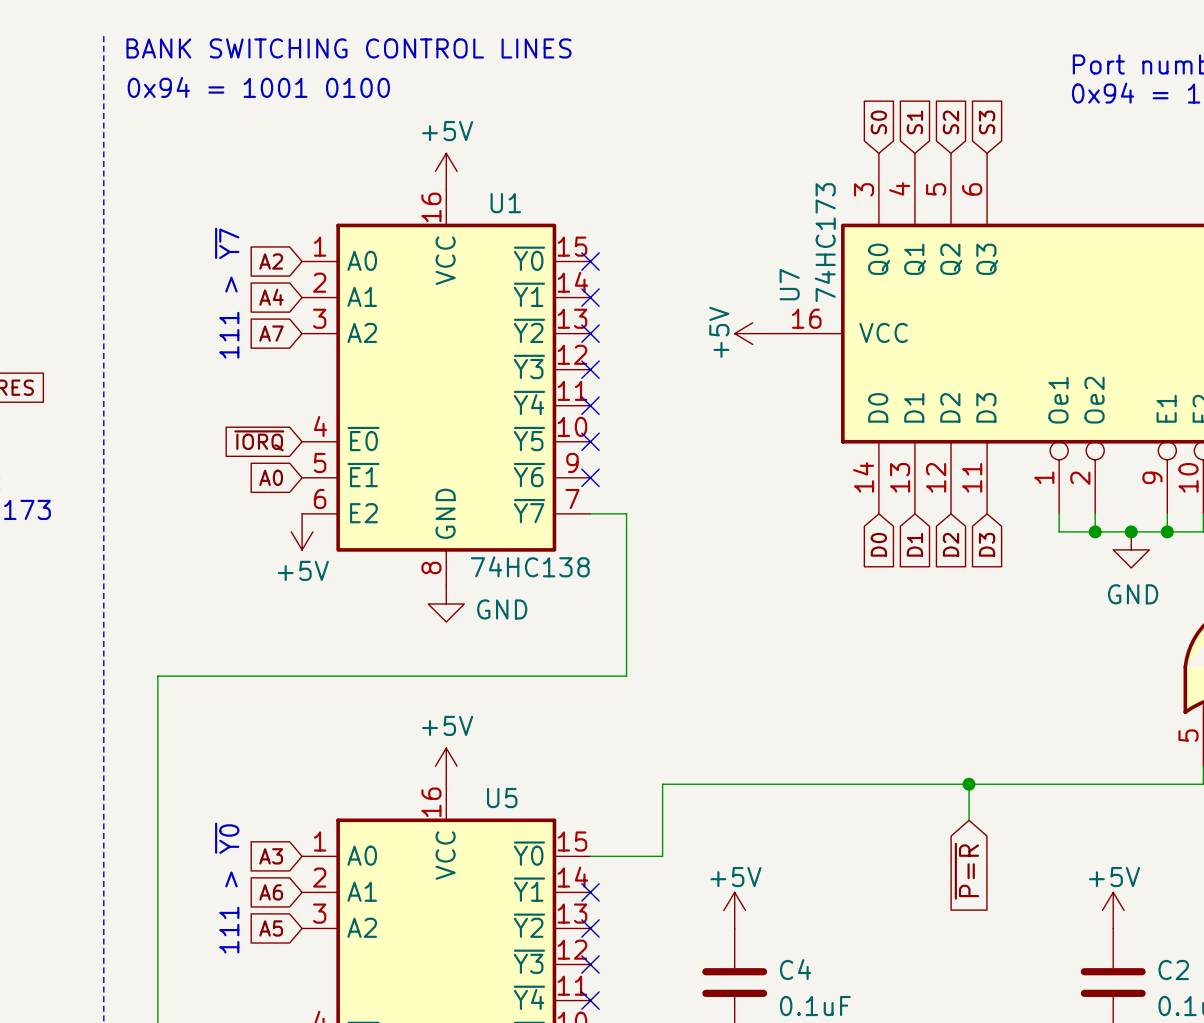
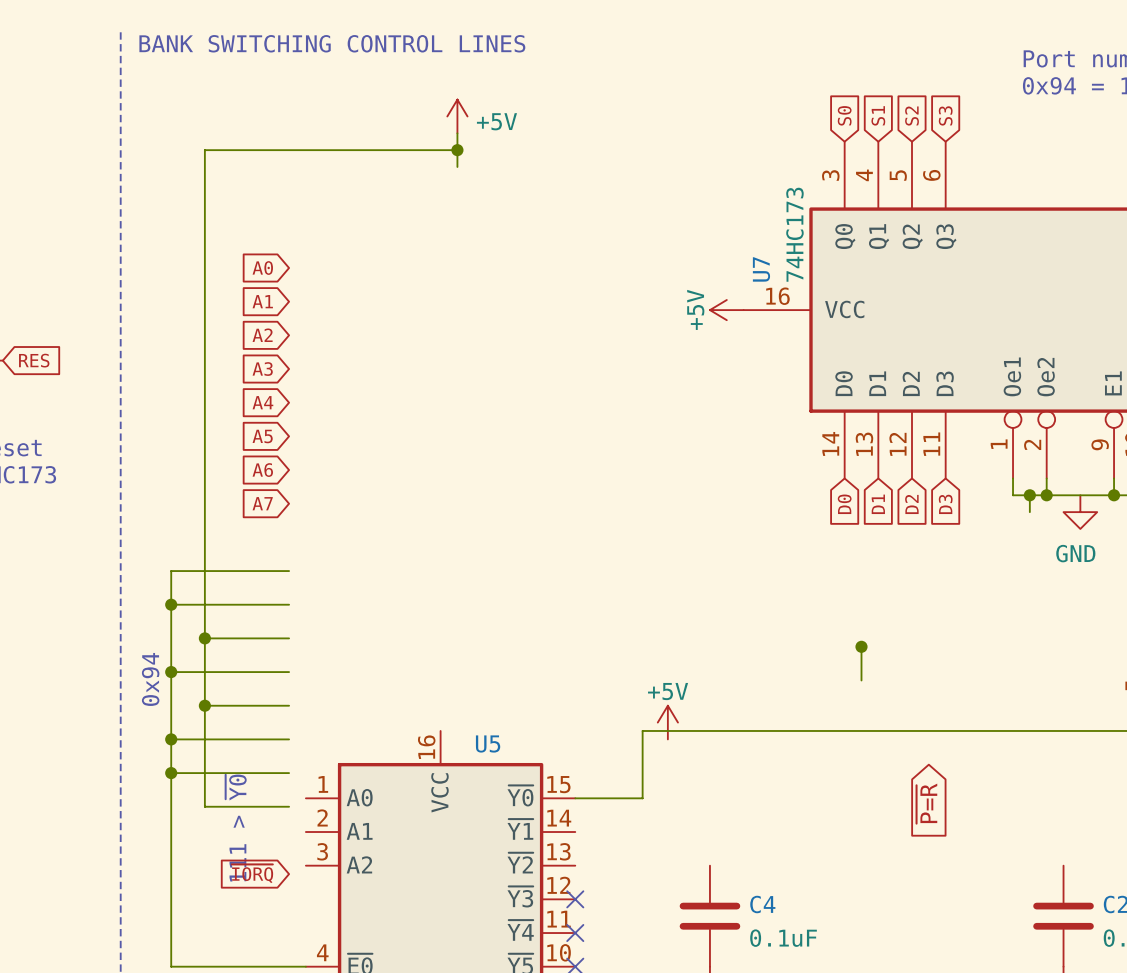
text: 0x94 = 1001 0100 (258, 87) -> none
power symbol text position: +5V (447, 131) -> +5V (496, 121)
wire: none -> (457, 133) (457, 166)
wire: none -> (457, 150) (204, 150) (204, 806) (289, 806)
junction: none -> (457, 150)
power symbol position: +5V (446, 171) -> +5V (457, 116)
global label position: A2 (271, 261) -> A2 (262, 335)
no-connect mark: (590, 261) -> none
text: 111 > ~{Y7} (227, 293) -> none
global label position: A4 (271, 297) -> A4 (262, 402)
no-connect mark: (590, 297) -> none
global label: none -> A1 (262, 301)
global label position: A7 (271, 333) -> A7 (262, 503)
no-connect mark: (590, 333) -> none
no-connect mark: (590, 369) -> none
U1: 74HC138 (446, 387) -> none
global label: none -> A3 (262, 369)
no-connect mark: (590, 405) -> none
global label: ~{IORQ} (259, 440) -> none
no-connect mark: (590, 441) -> none
global label: none -> A5 (262, 436)
global label position: A0 (271, 477) -> A0 (262, 268)
no-connect mark: (590, 477) -> none
global label: none -> A6 (262, 470)
wire: (590, 513) (626, 513) (626, 676) (157, 676) -> (289, 571) (171, 571) (171, 629)
power symbol: +5V (302, 531) -> none
wire: none -> (1029, 495) (1029, 512)
junction position: (1131, 531) -> (1029, 495)
power symbol: GND (446, 604) -> none
wire: none -> (171, 604) (289, 604)
junction: none -> (171, 604)
wire: none -> (204, 638) (289, 638)
junction: none -> (204, 638)
junction: none -> (861, 646)
wire: none -> (171, 672) (289, 672)
junction: none -> (171, 672)
text: none -> 0x94 (150, 679)
wire: none -> (204, 705) (289, 705)
junction: none -> (204, 705)
power symbol: +5V (446, 766) -> none
power symbol: none -> +5V (667, 722)
wire: (969, 784) (969, 820) -> (861, 646) (861, 680)
junction: (969, 784) -> none
wire: none -> (171, 739) (289, 739)
junction: none -> (171, 739)
wire: none -> (171, 773) (289, 773)
junction: none -> (171, 773)
global label: A3 (271, 856) -> none
global label: A6 (271, 892) -> none
no-connect mark: (590, 892) -> none
power symbol: +5V (734, 910) -> none
power symbol: +5V (1113, 910) -> none
global label: A5 (271, 928) -> none
no-connect mark: (590, 928) -> none
global label: none -> ~{IORQ} (252, 873)

